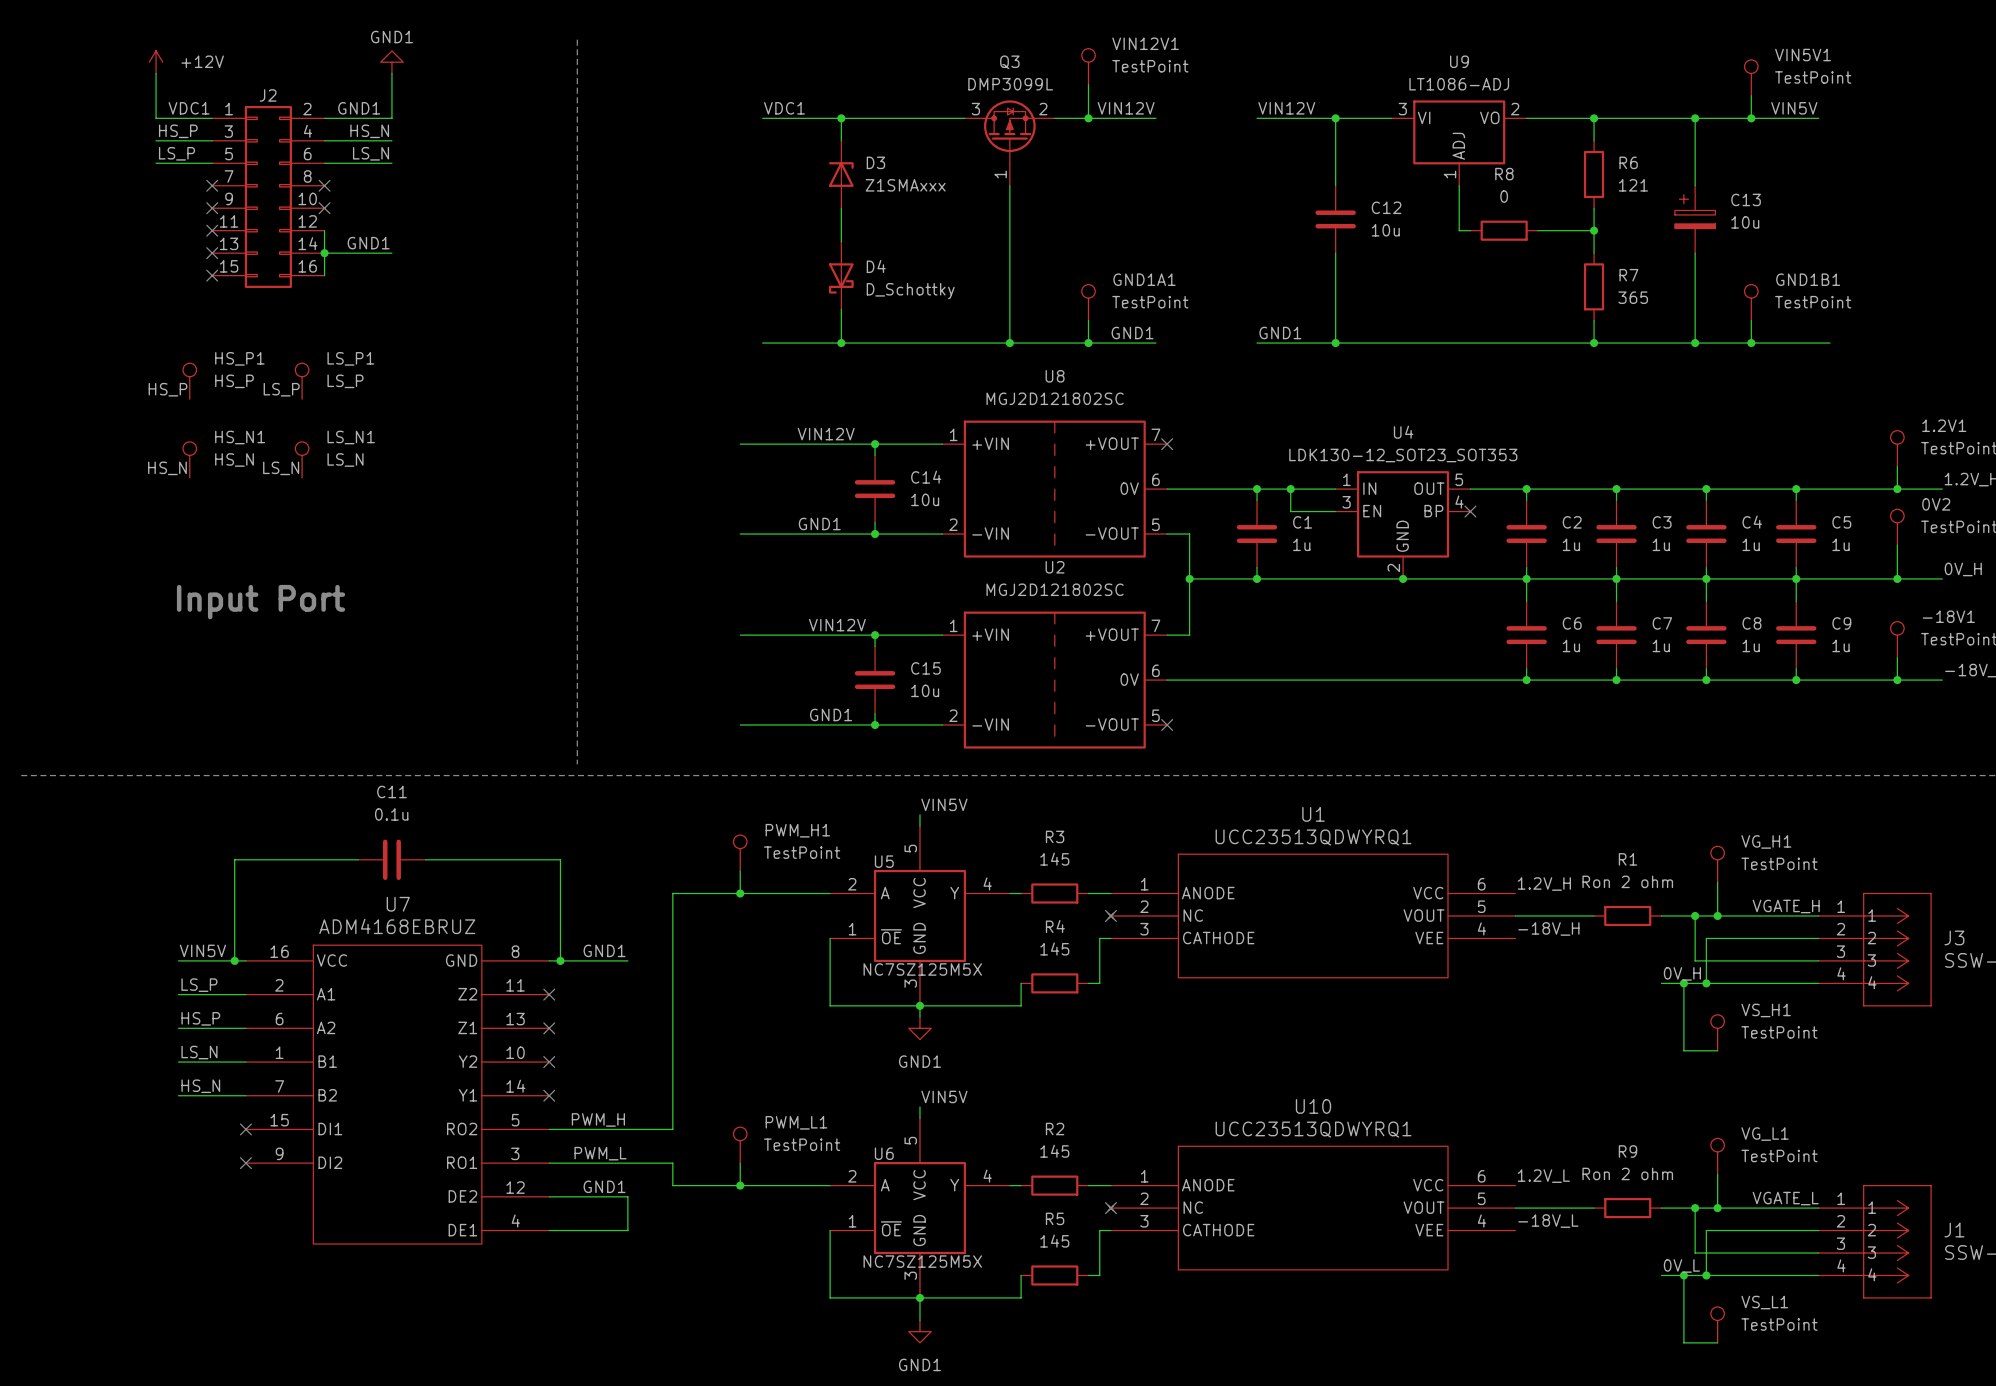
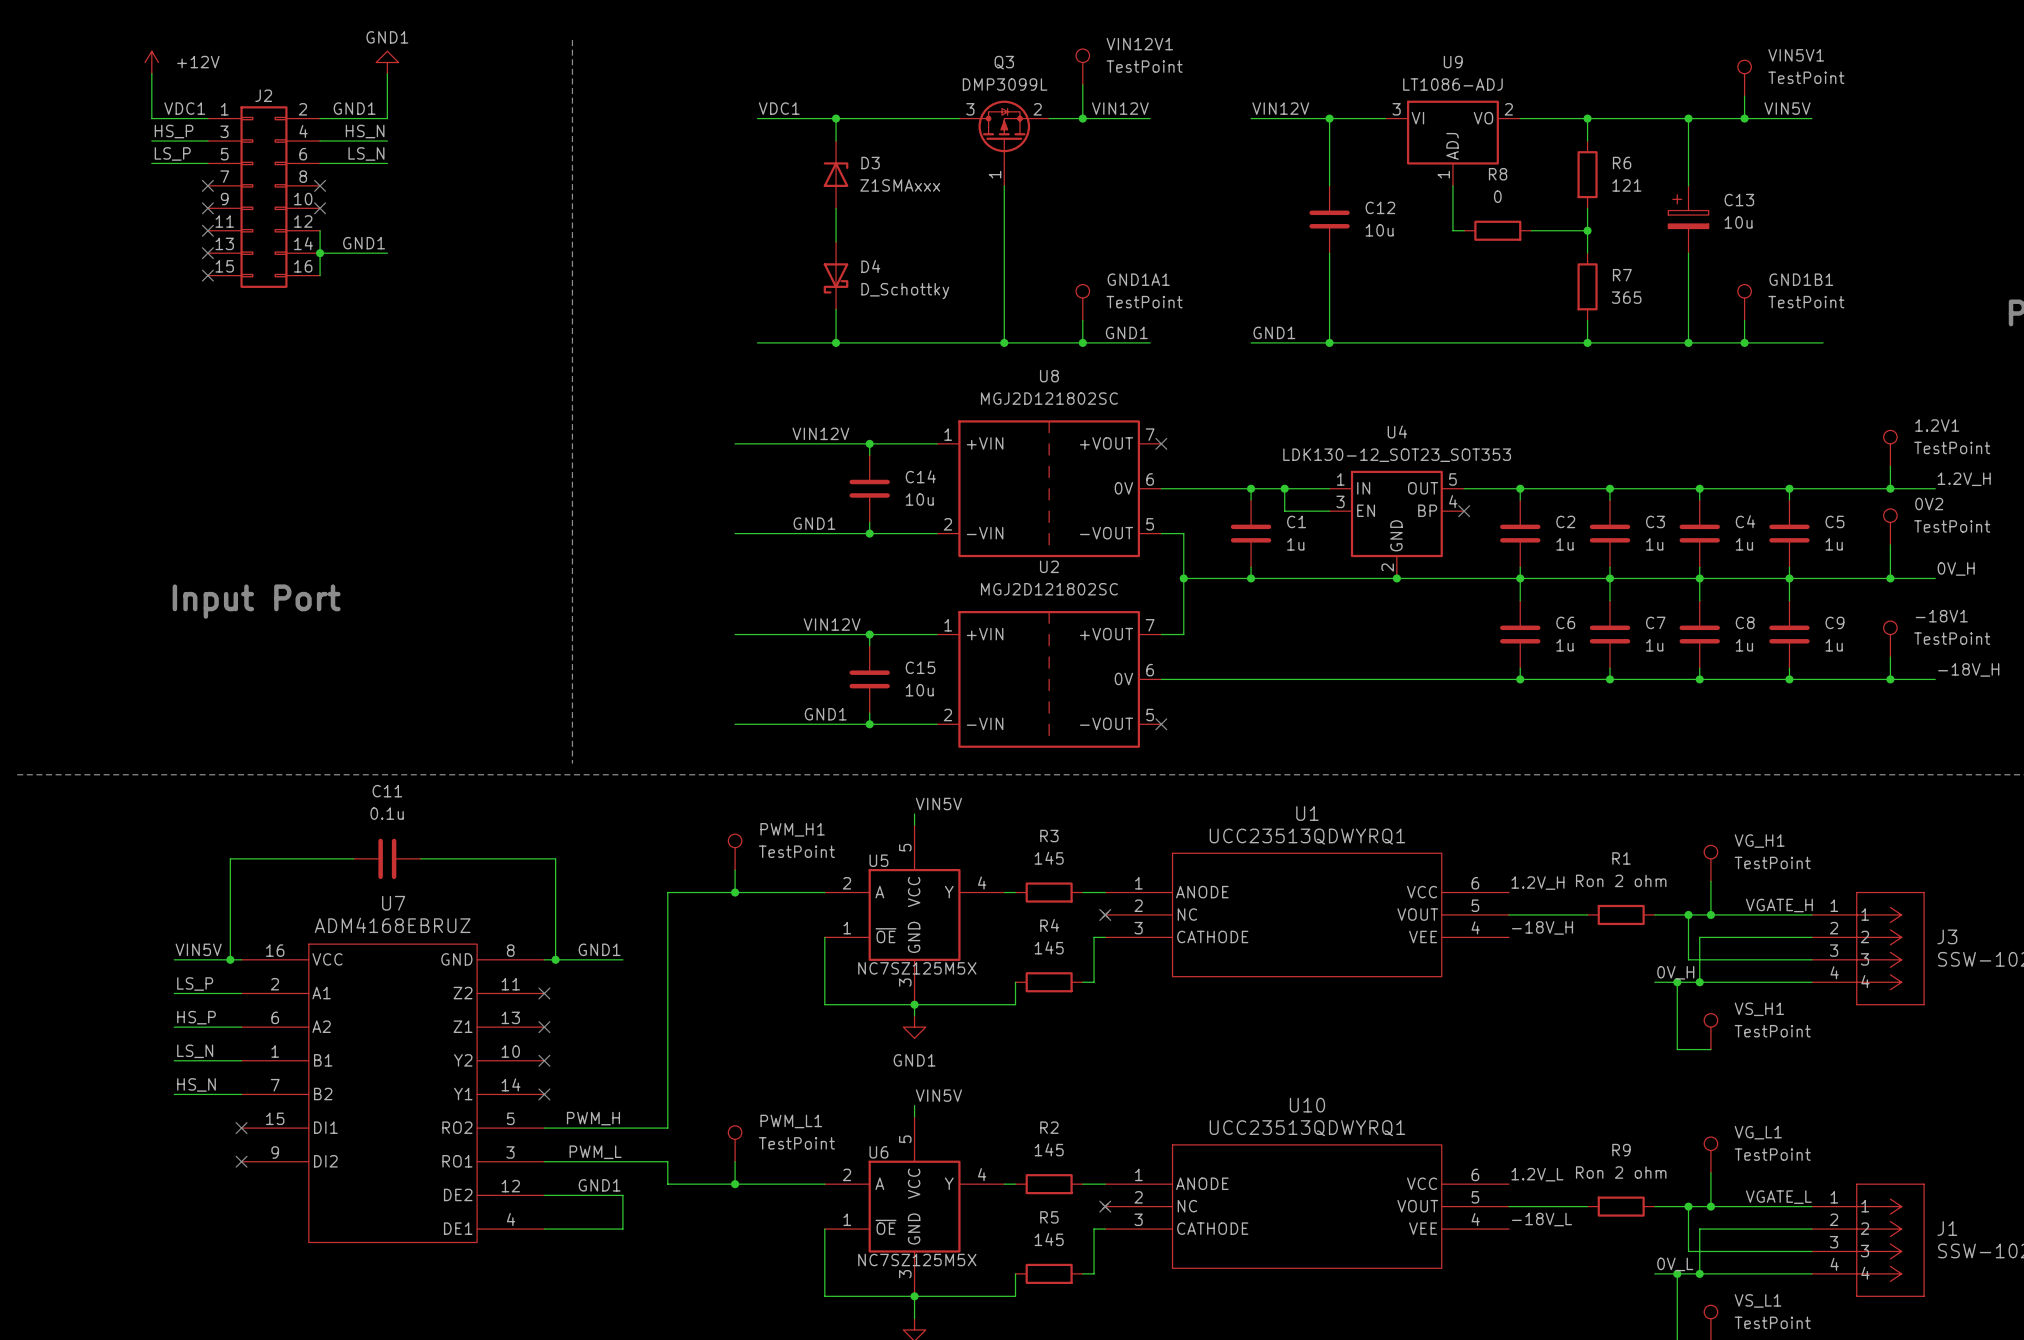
HS_P1: HS_P (189, 381) -> none
LS_P1: LS_P (302, 381) -> none
label: HS_P (168, 389) -> none
label: LS_P (281, 389) -> none
HS_N1: HS_N (189, 459) -> none
LS_N1: LS_N (302, 459) -> none
label: HS_N (167, 468) -> none
label: LS_N (281, 468) -> none

